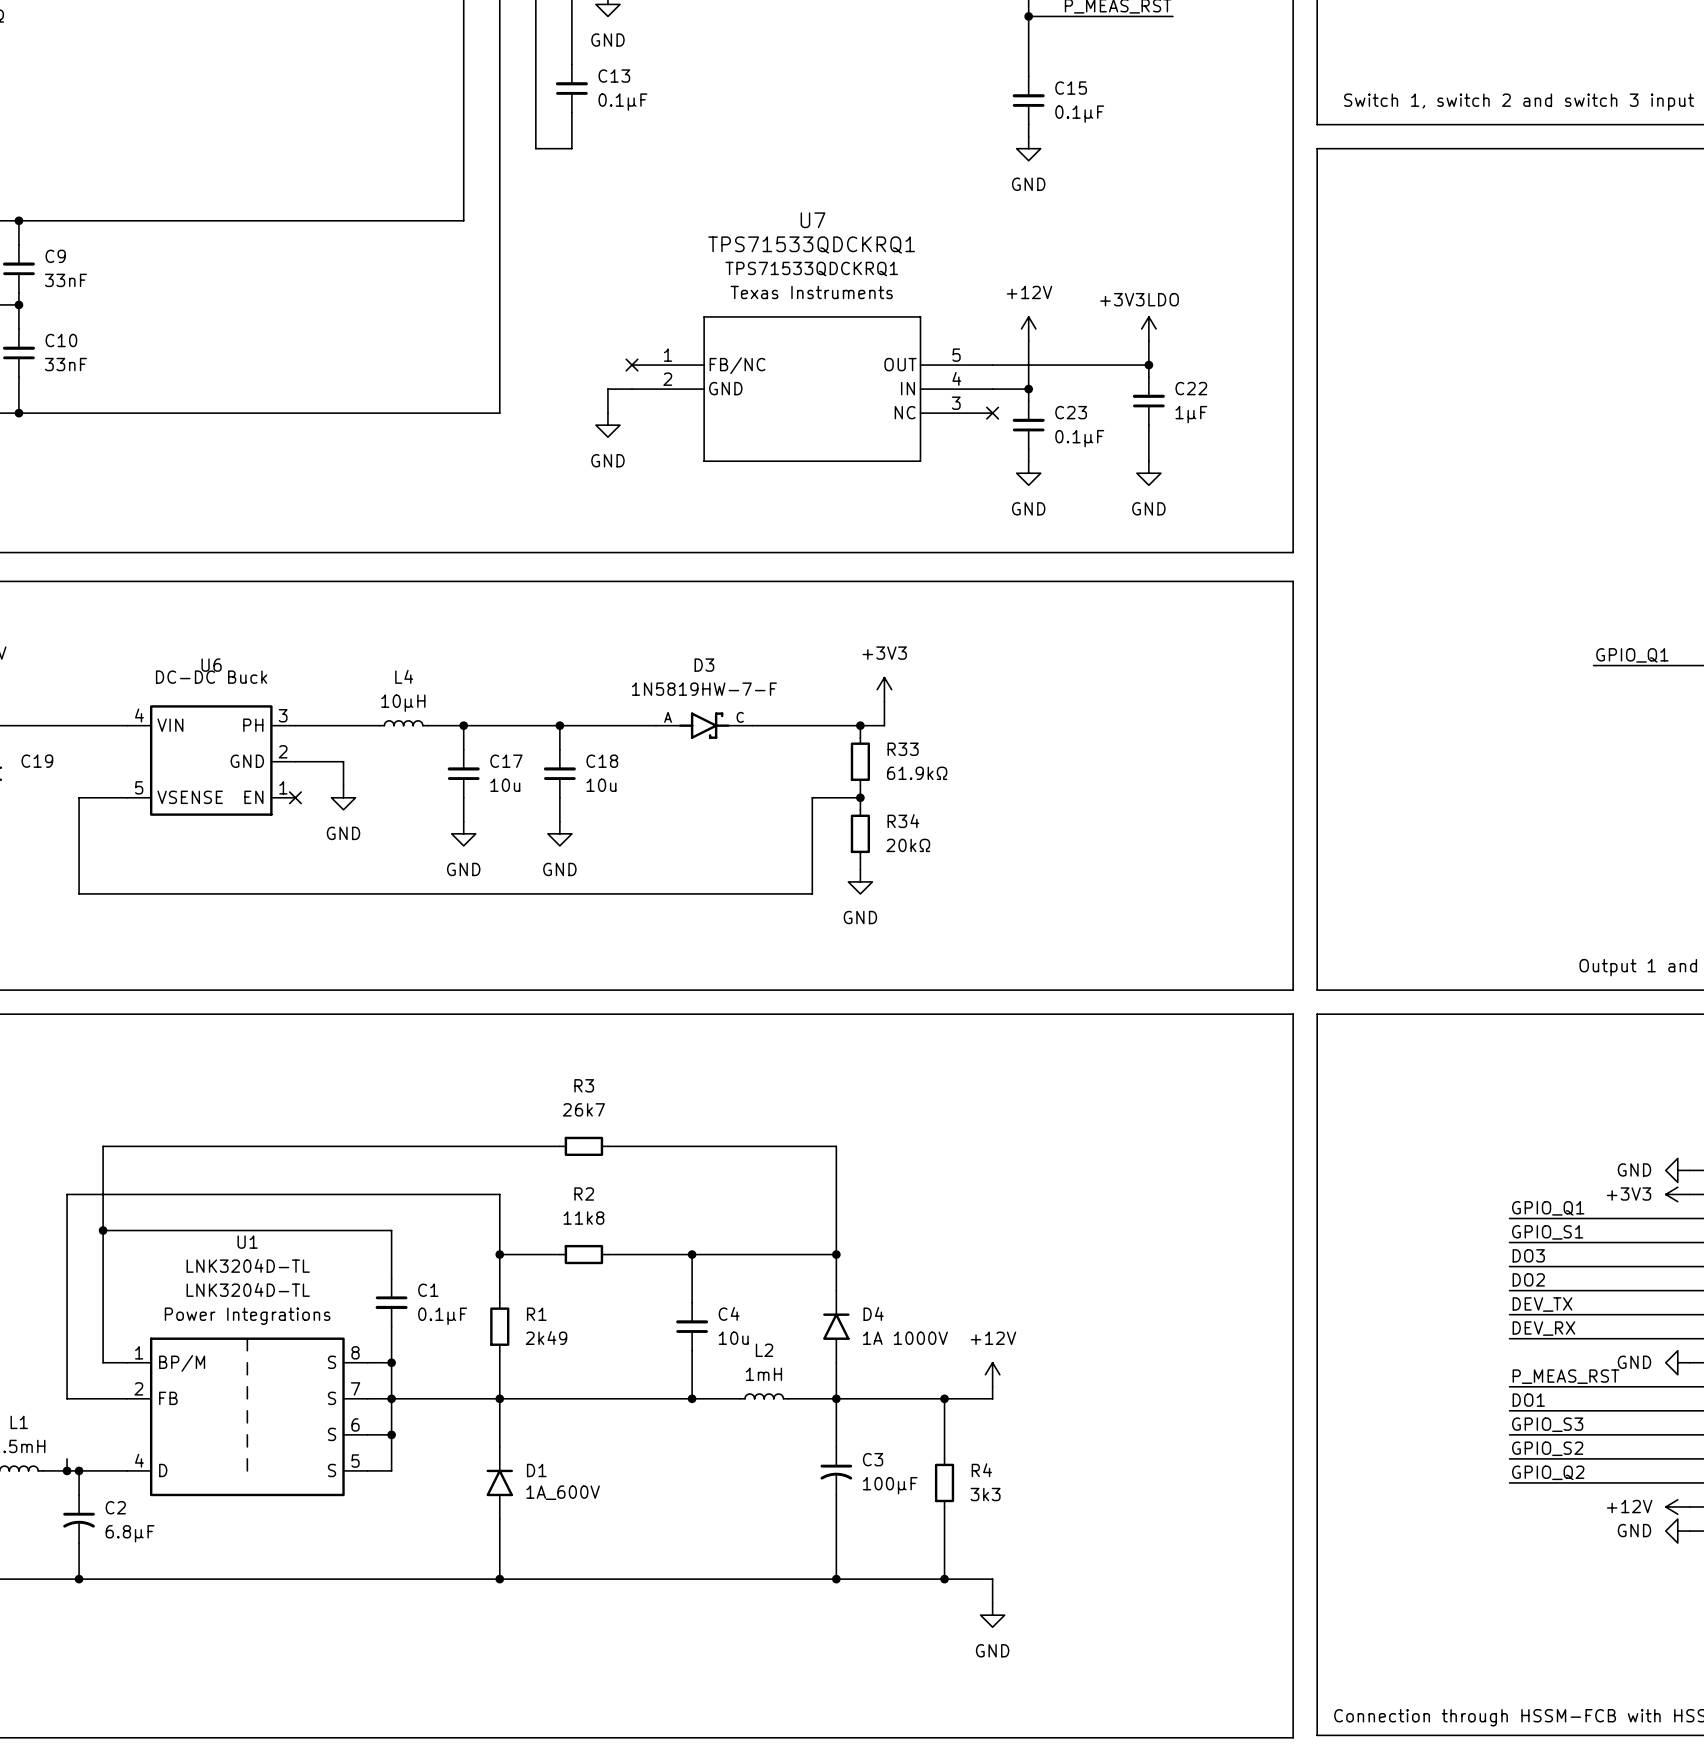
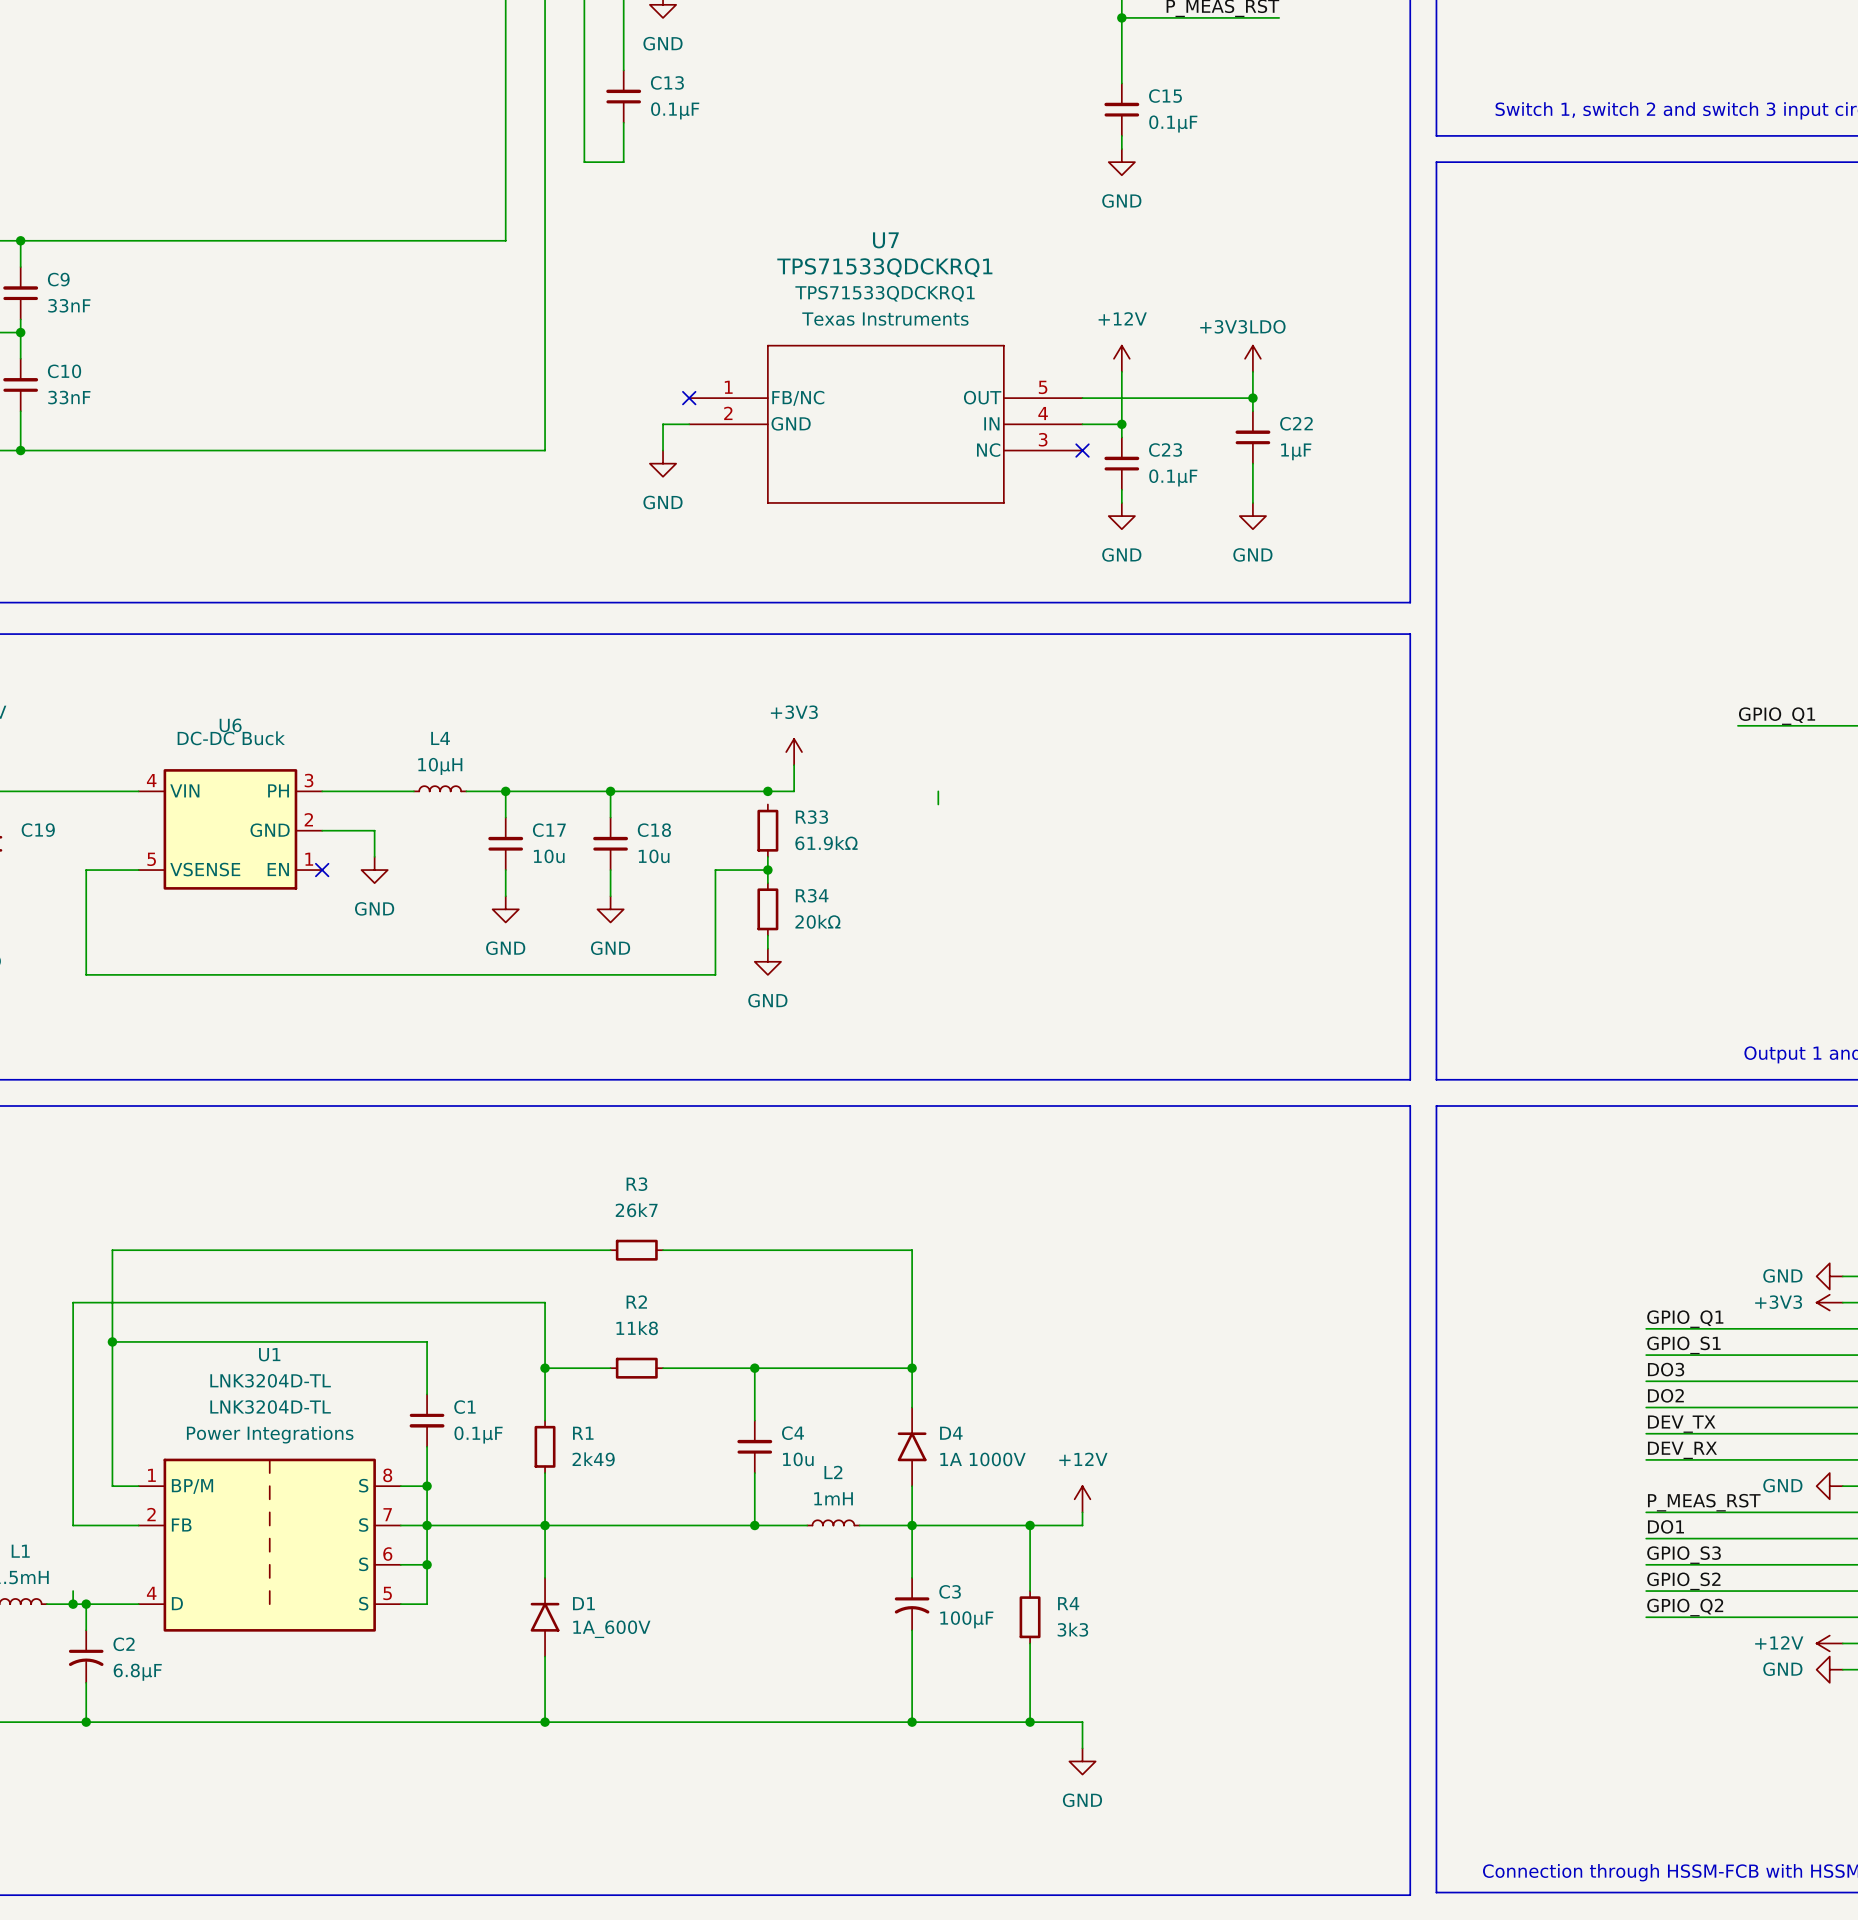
power symbol position: +3V3 (884, 689) -> +3V3 (794, 752)
wire: none -> (794, 765) (794, 791) (715, 791)
wire: (884, 701) (884, 725) (752, 725) -> none
junction: none -> (767, 791)
D3: 1N5819HW-7-F (704, 725) -> none
junction: (860, 725) -> none
R33 position: (860, 761) -> (767, 830)
wire: (860, 785) (860, 809) -> (767, 856) (767, 883)
junction: none -> (767, 870)
wire: (860, 797) (812, 797) (812, 893) (656, 893) -> (767, 870) (715, 870) (715, 974)
junction: (860, 797) -> none
R34 position: (860, 833) -> (767, 909)
wire: (860, 857) (860, 869) -> (767, 935) (767, 948)
power symbol position: GND (860, 881) -> GND (767, 961)

